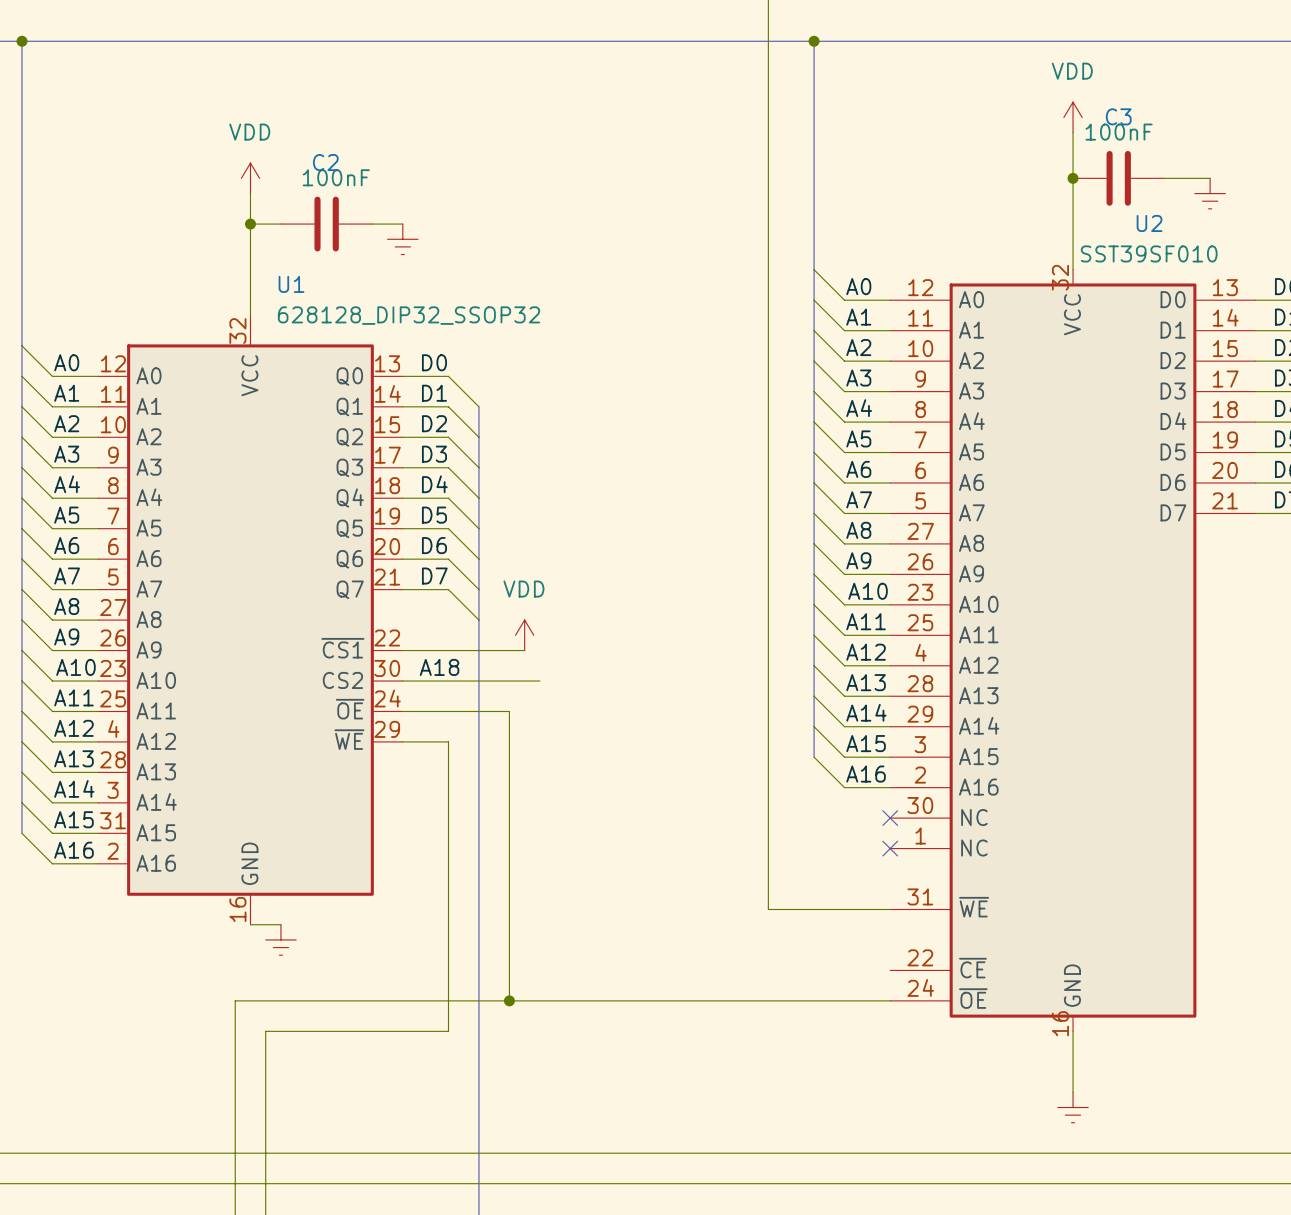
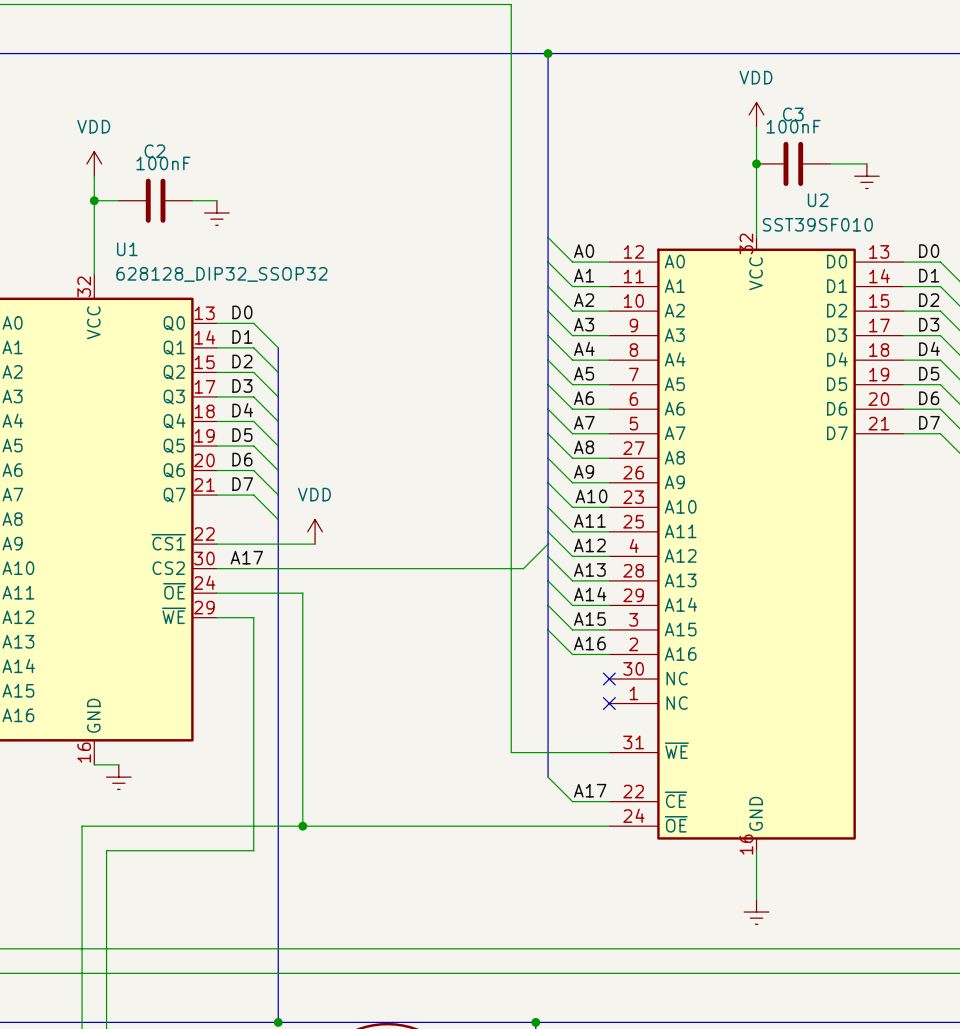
wire: none -> (548, 544) (523, 568) (327, 568)
label: A18 (439, 667) -> A17 (246, 557)
bus: none -> (548, 629) (548, 777)
wire: none -> (548, 777) (572, 801) (609, 801)
label: none -> A17 (590, 790)

